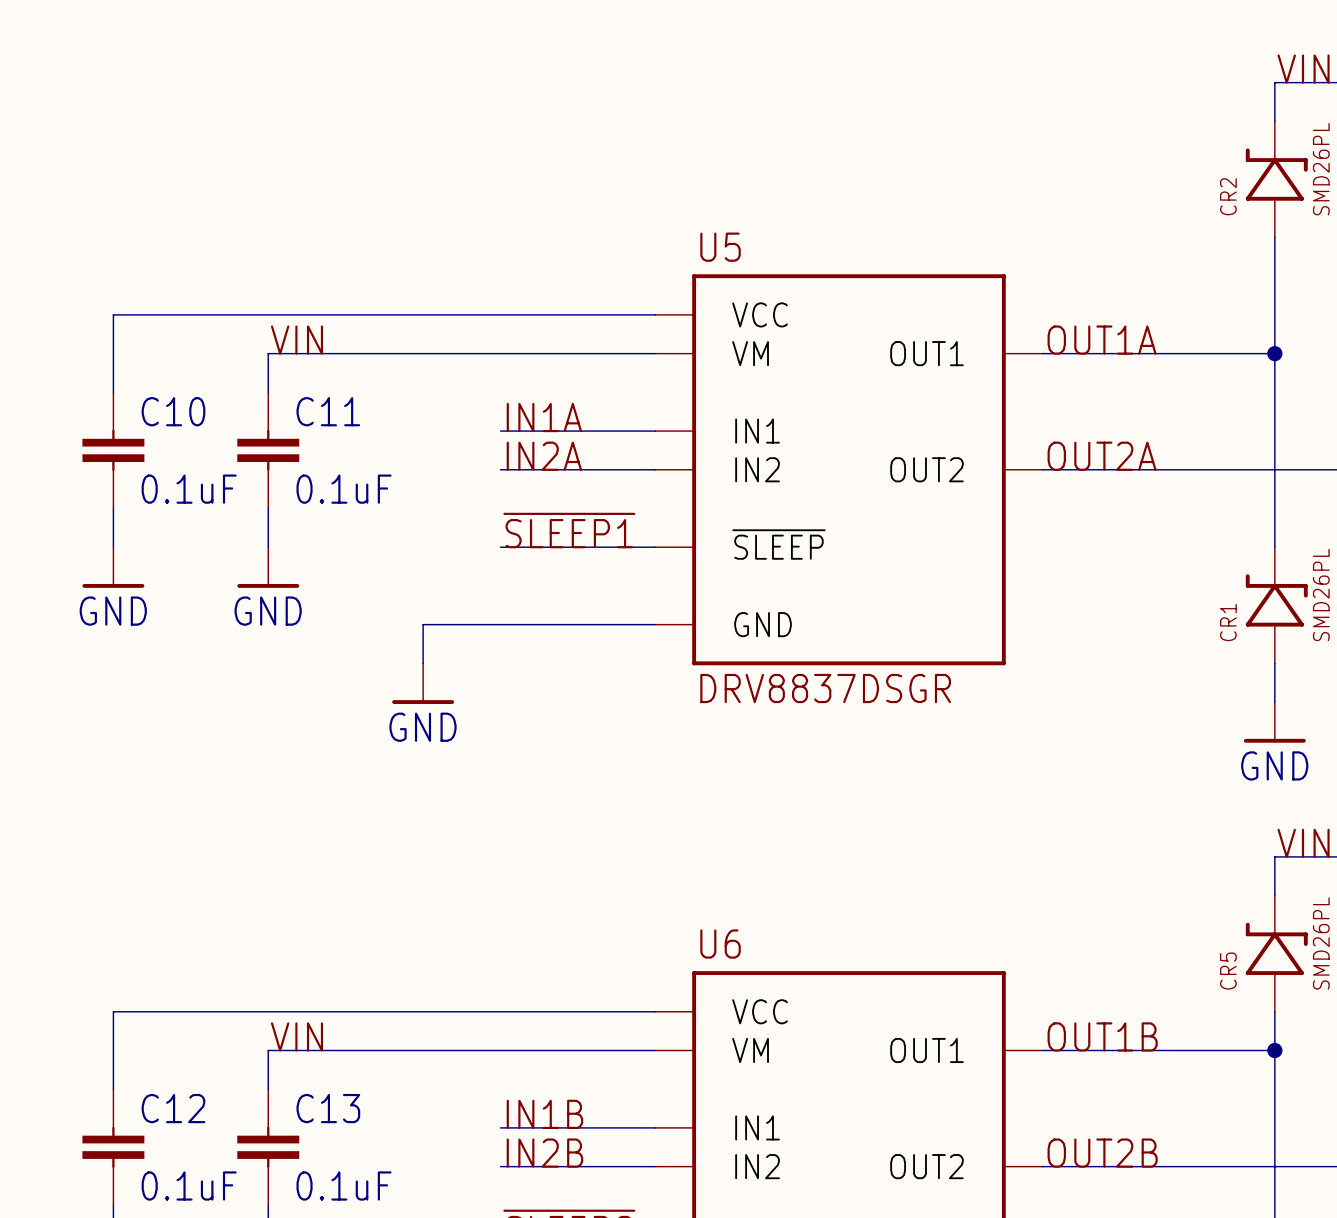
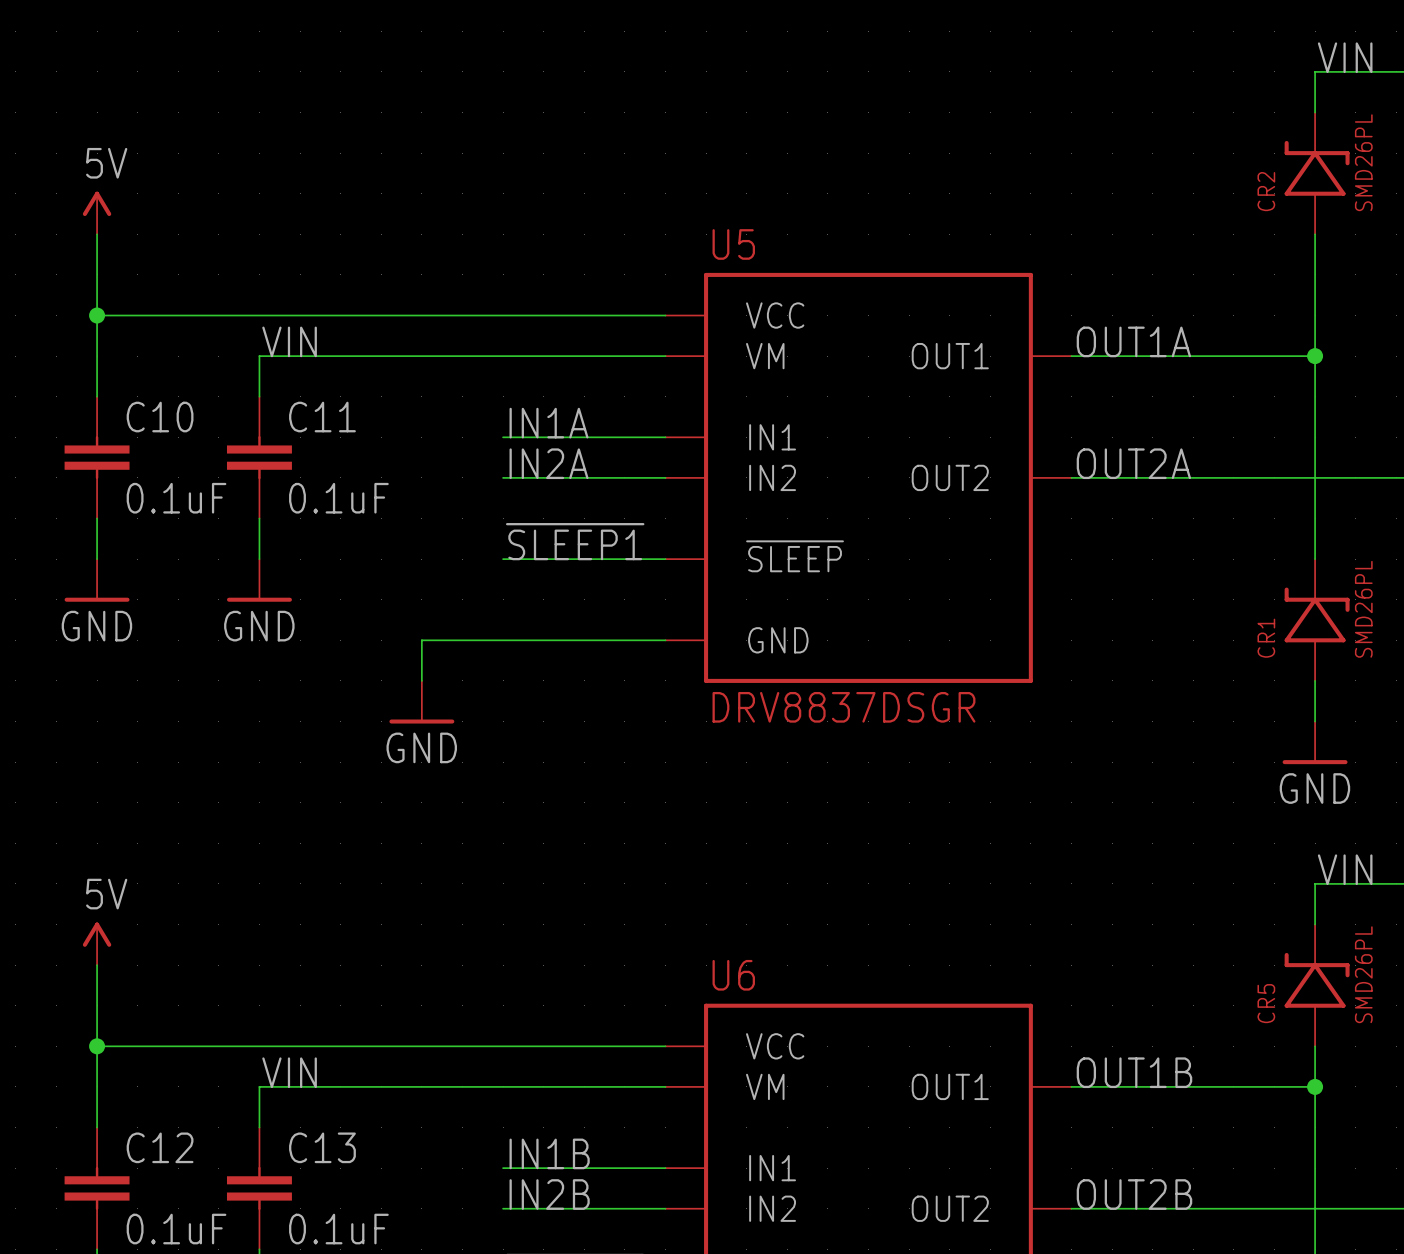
power symbol: none -> 5V (97, 213)
wire: none -> (97, 234) (97, 315)
junction: none -> (97, 315)
power symbol: none -> 5V (97, 943)
wire: none -> (97, 965) (97, 1046)
junction: none -> (97, 1046)

